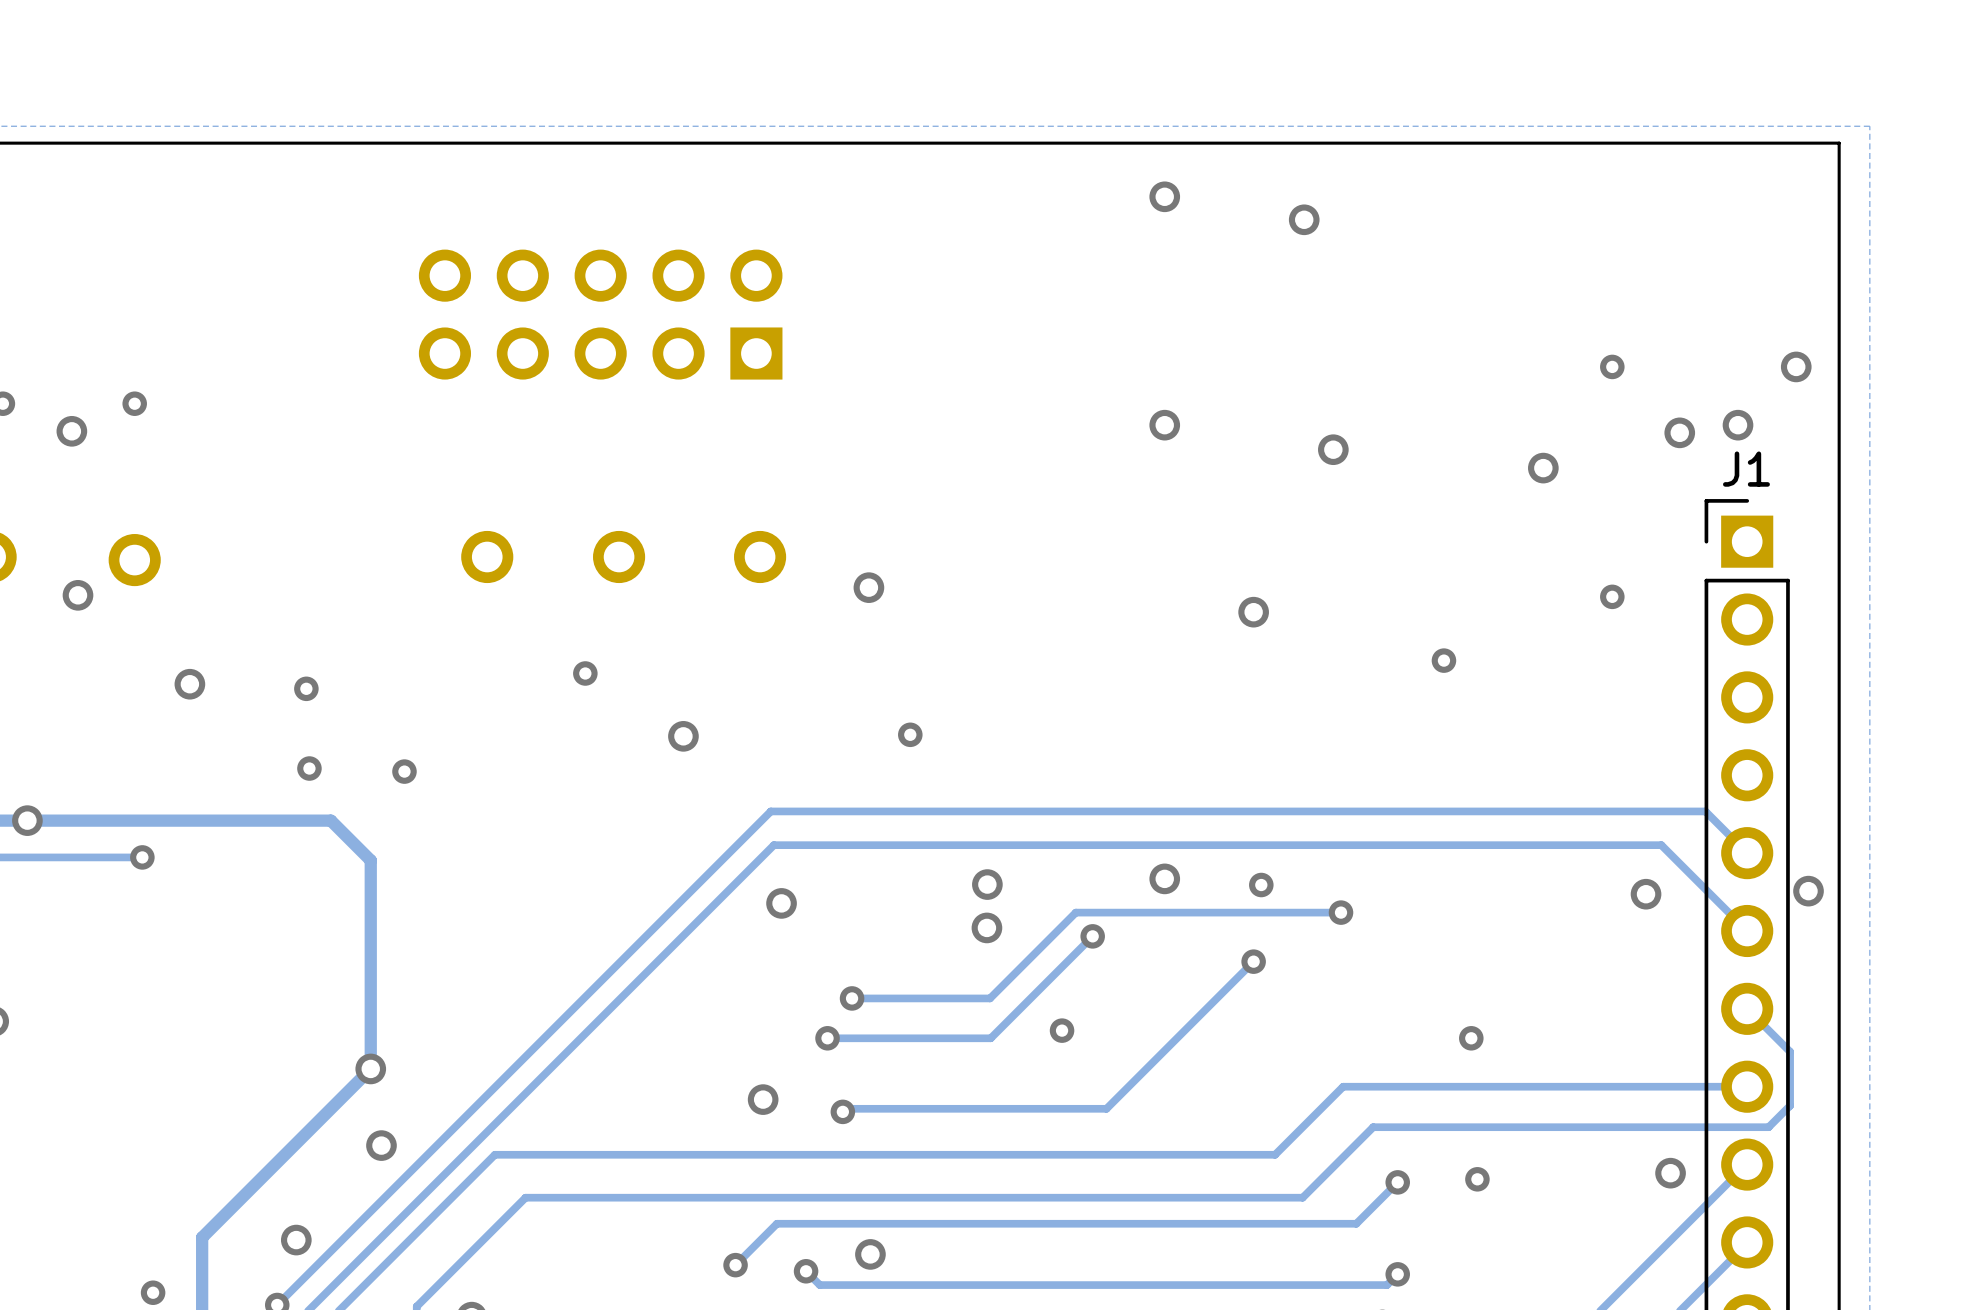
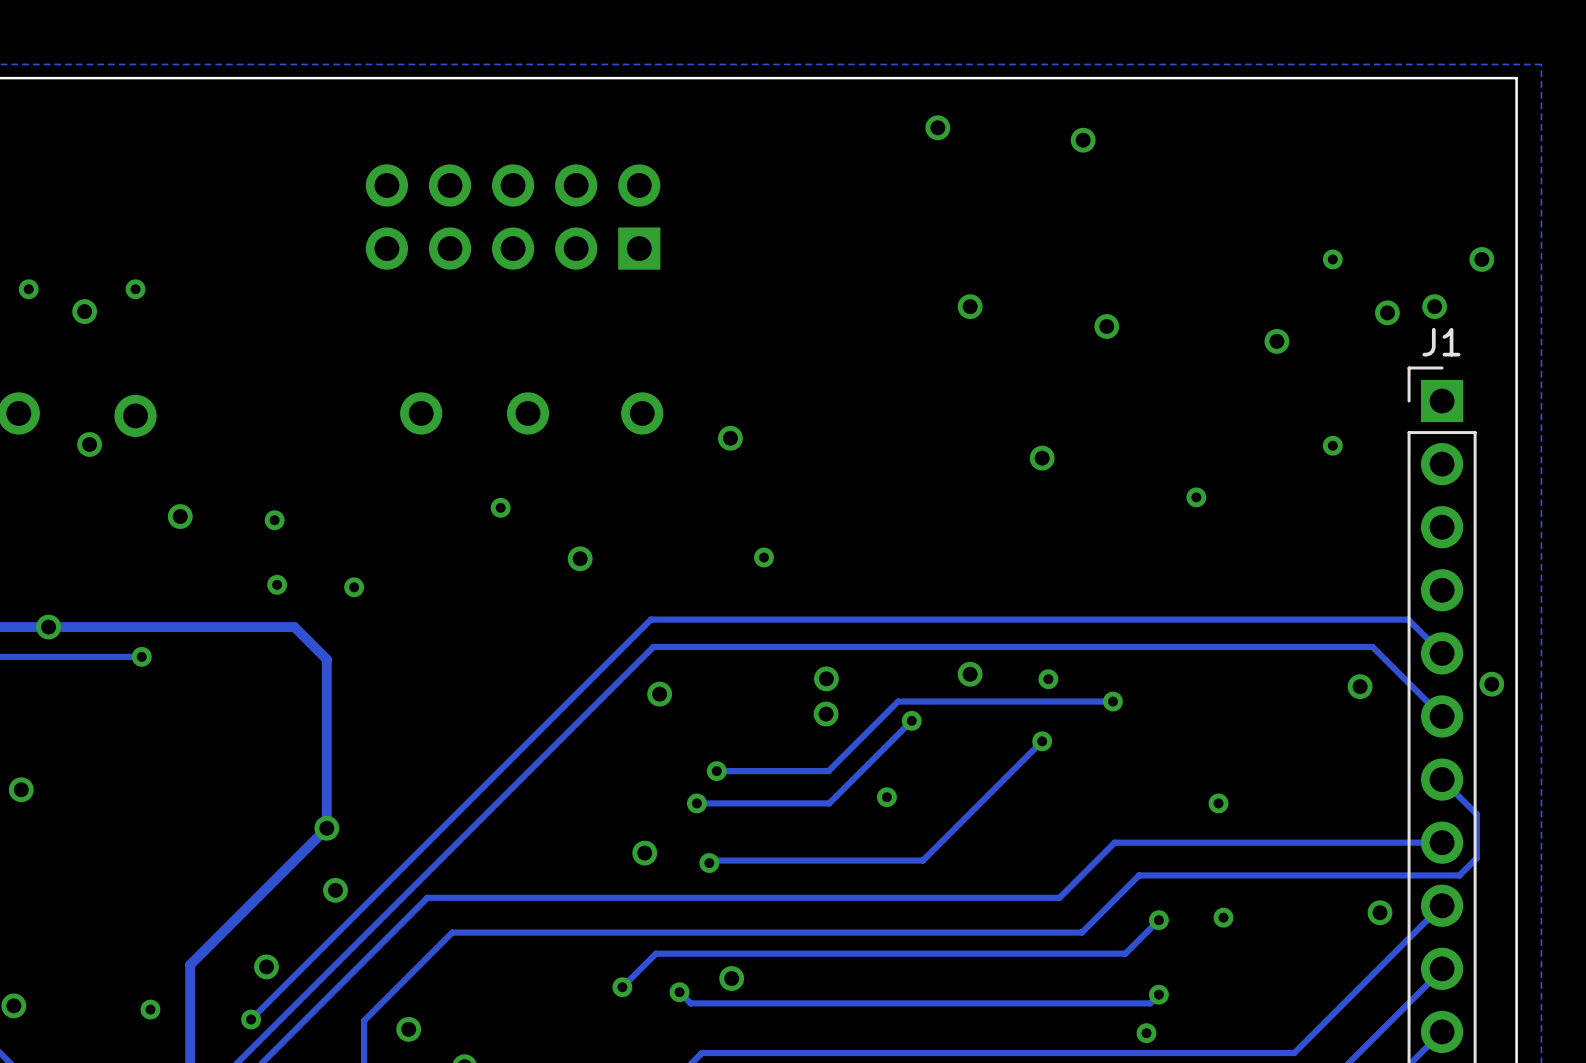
via position: (1164, 196) -> (937, 127)

